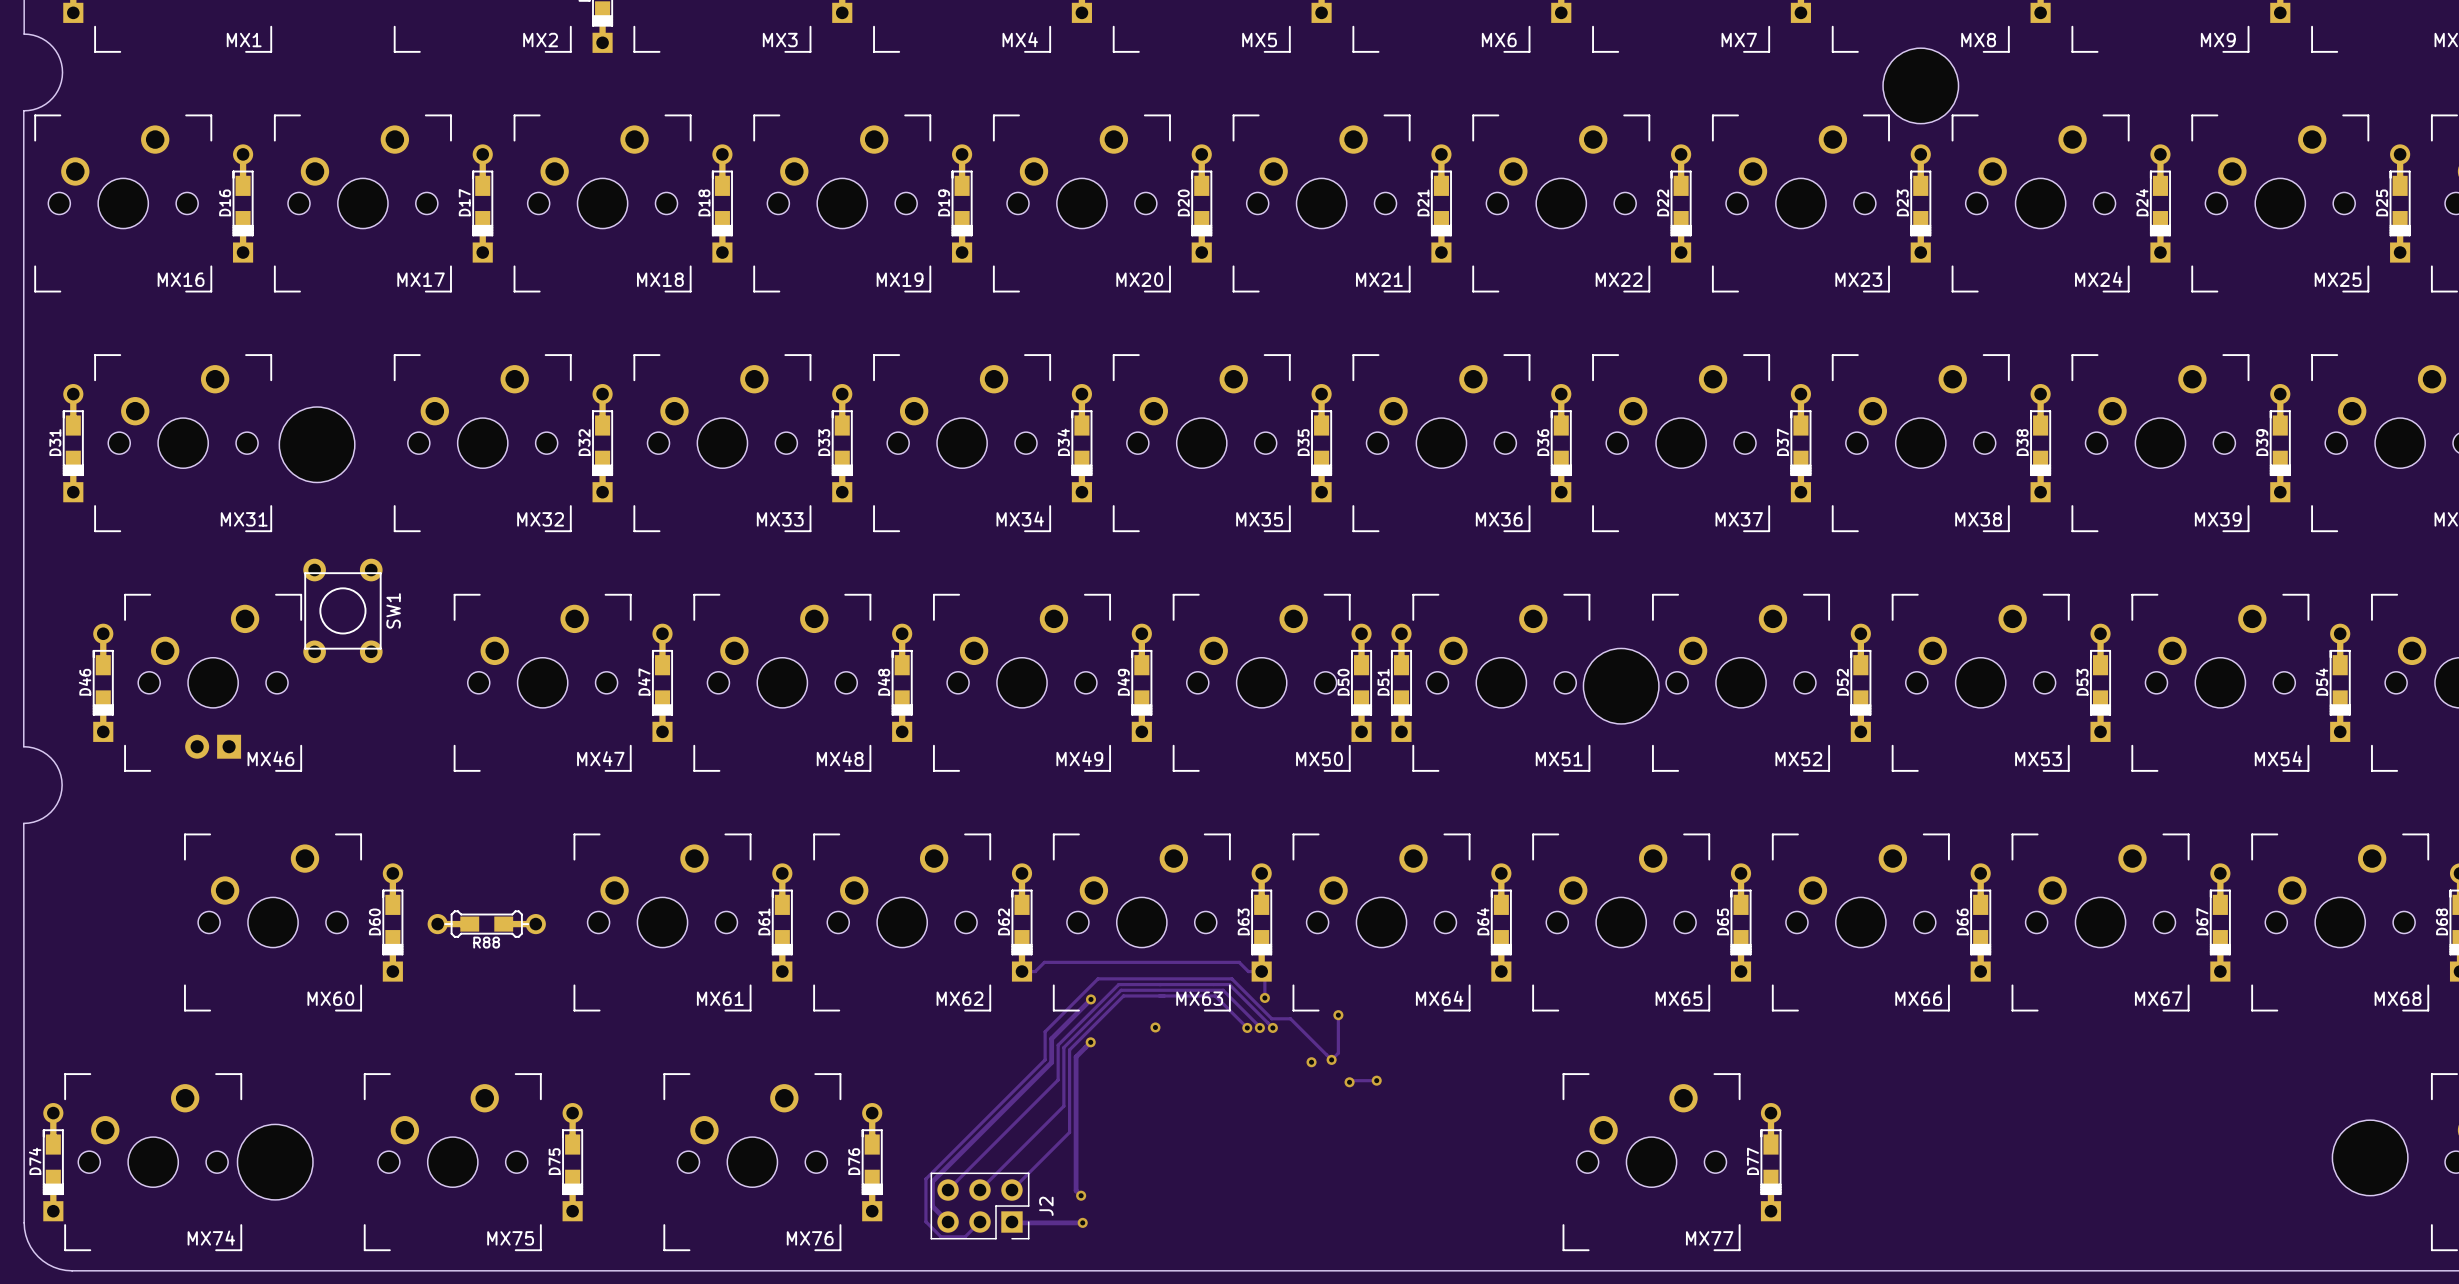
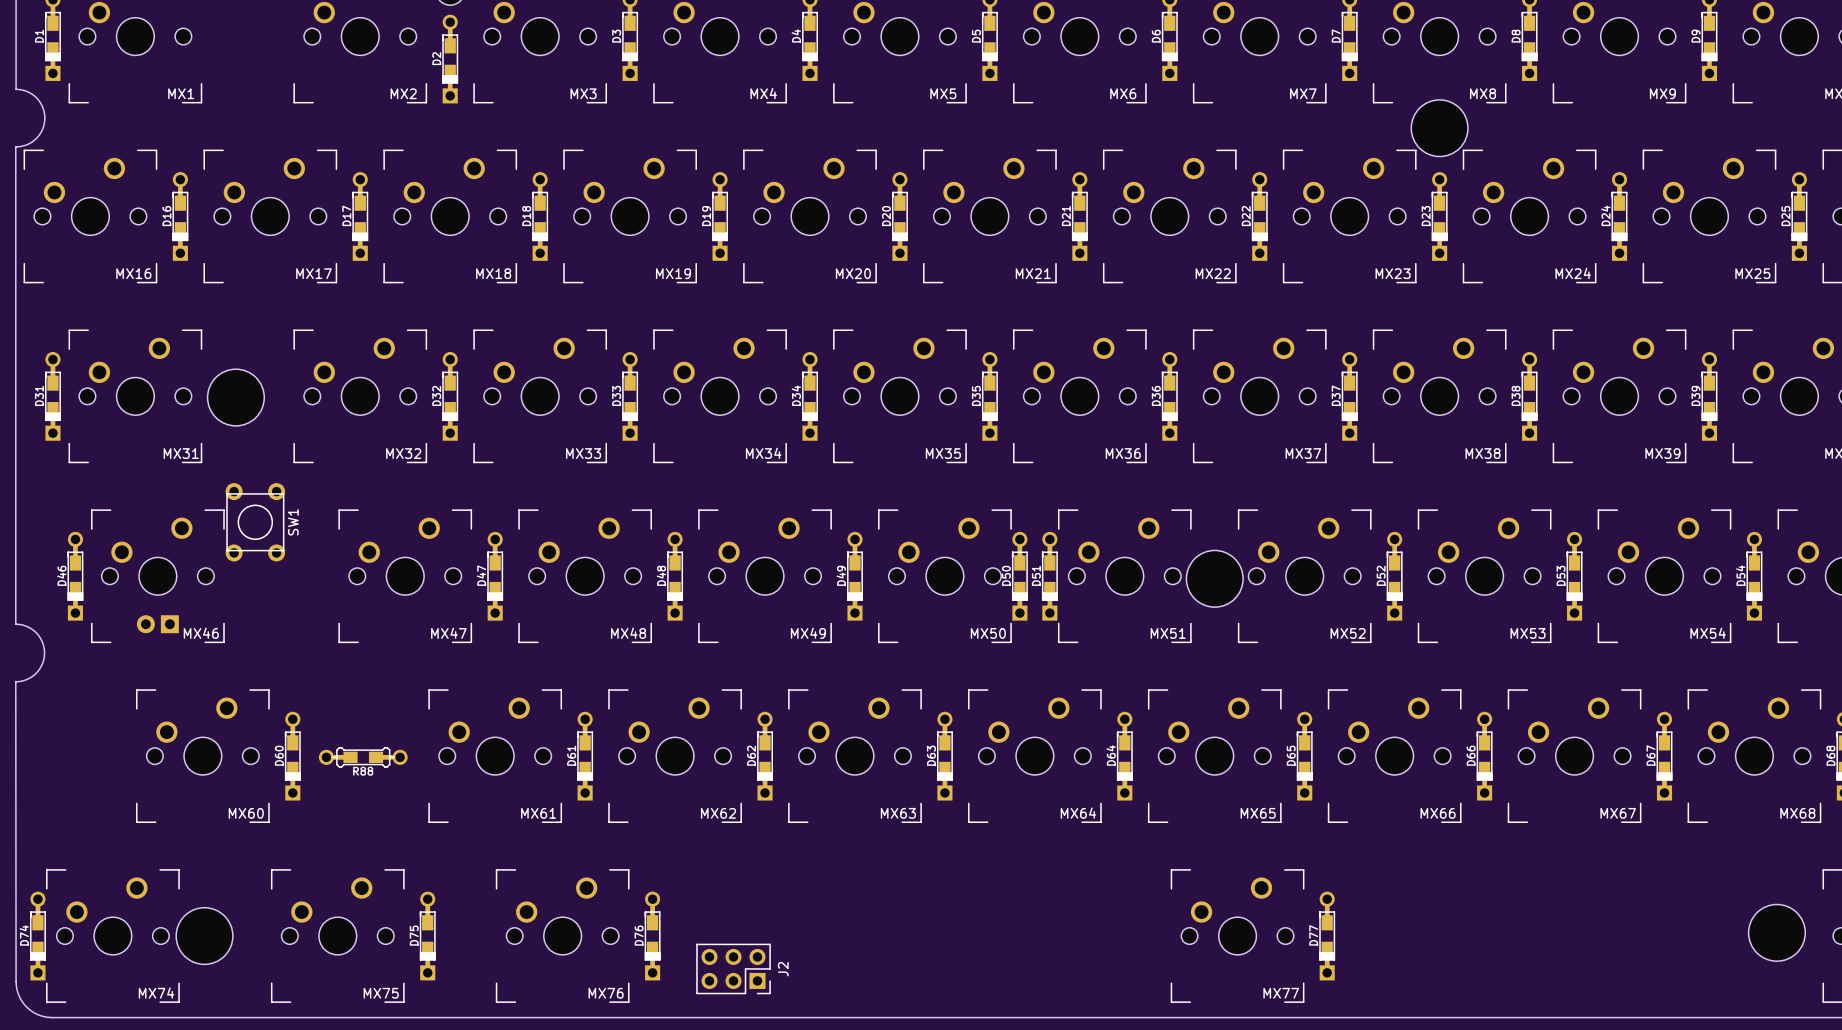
track: (1022, 971) (1035, 971) (1044, 962) (1239, 962) (1248, 971) (1261, 971) (1264, 974) (1264, 997) -> none
via: (1264, 997) -> none
track: (1090, 999) (1051, 1038) (1051, 1062) (932, 1181) (932, 1206) (948, 1222) -> none
via: (1090, 999) -> none
track: (1338, 1015) (1338, 1053) (1331, 1059) (1290, 1018) (1271, 1018) (1231, 978) (1098, 978) (1045, 1031) (1045, 1059) (925, 1178) (925, 1221) (940, 1236) (965, 1236) (980, 1222) -> none
via: (1338, 1015) -> none
via: (1155, 1027) -> none
track: (1247, 1027) (1215, 995) (1123, 995) (1069, 1049) (1069, 1132) (1011, 1190) -> none
via: (1247, 1027) -> none
track: (1259, 1027) (1223, 990) (1121, 990) (1063, 1047) (1063, 1106) (980, 1190) -> none
via: (1259, 1027) -> none
track: (1272, 1027) (1229, 984) (1118, 984) (1058, 1045) (1058, 1079) (948, 1190) -> none
via: (1272, 1027) -> none
track: (1090, 1042) (1076, 1056) (1076, 1190) (1081, 1195) -> none
via: (1090, 1042) -> none
via: (1331, 1059) -> none
via: (1311, 1062) -> none
track: (1376, 1080) (1351, 1080) (1349, 1082) -> none
via: (1376, 1080) -> none
via: (1349, 1082) -> none
via: (1081, 1195) -> none
track: (1011, 1222) (1082, 1222) -> none
via: (1082, 1222) -> none

